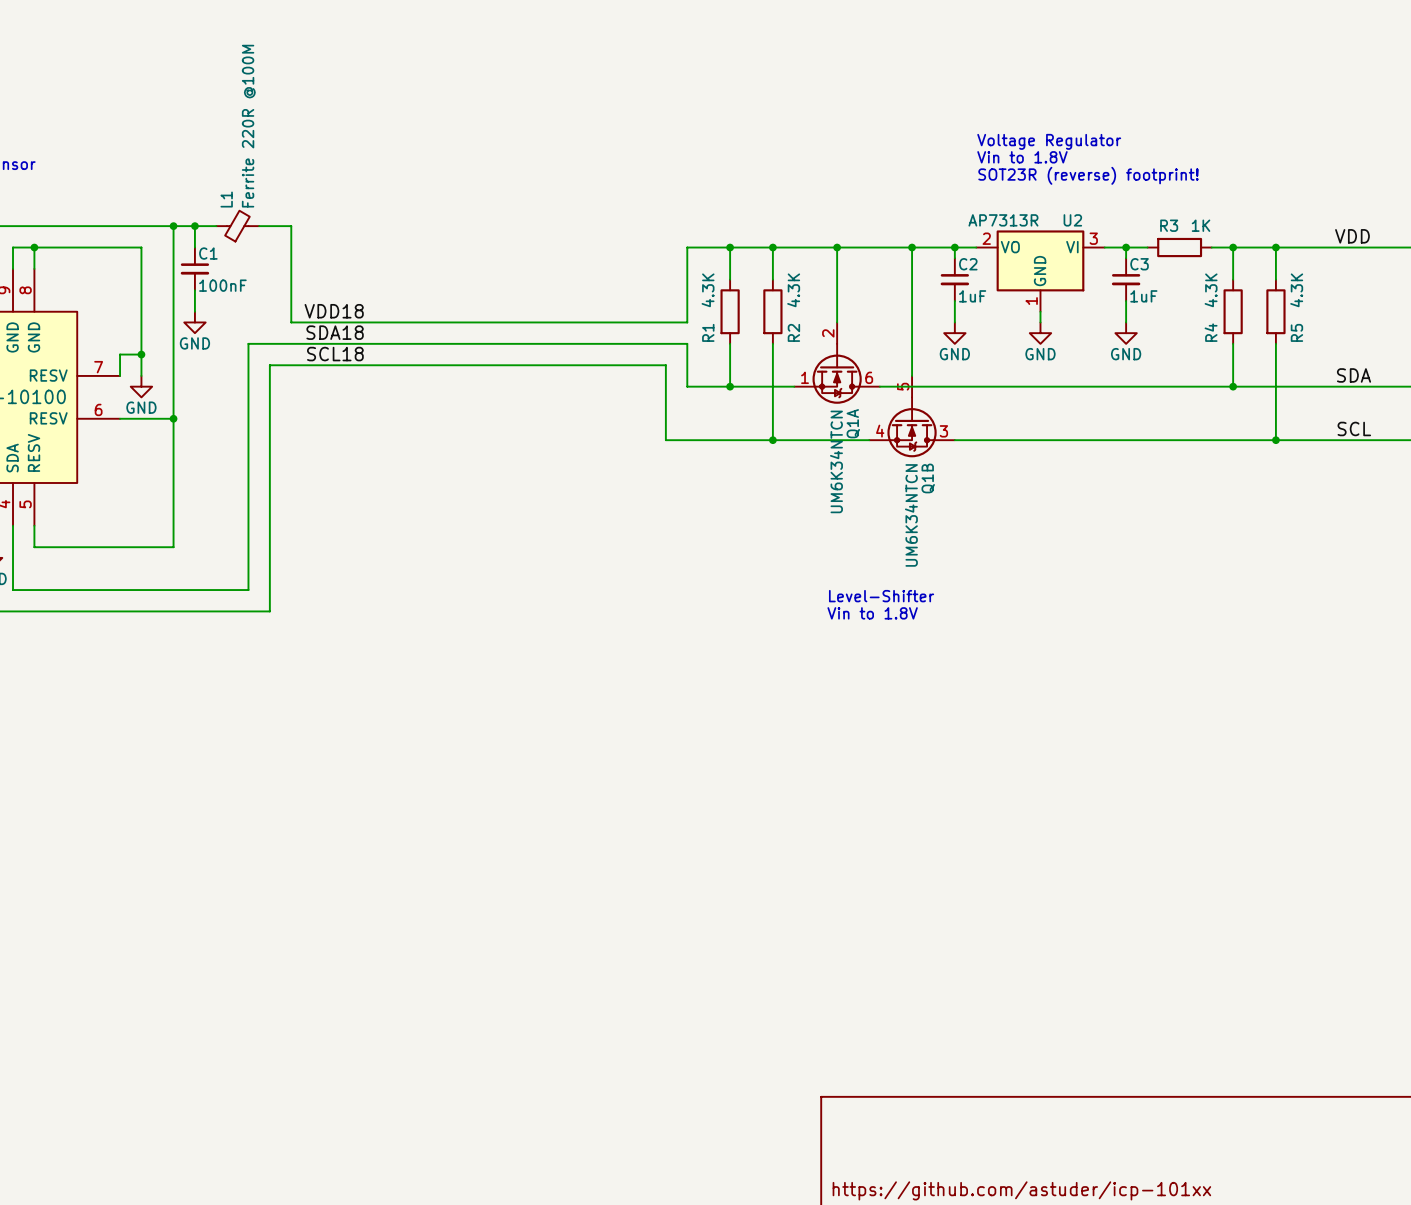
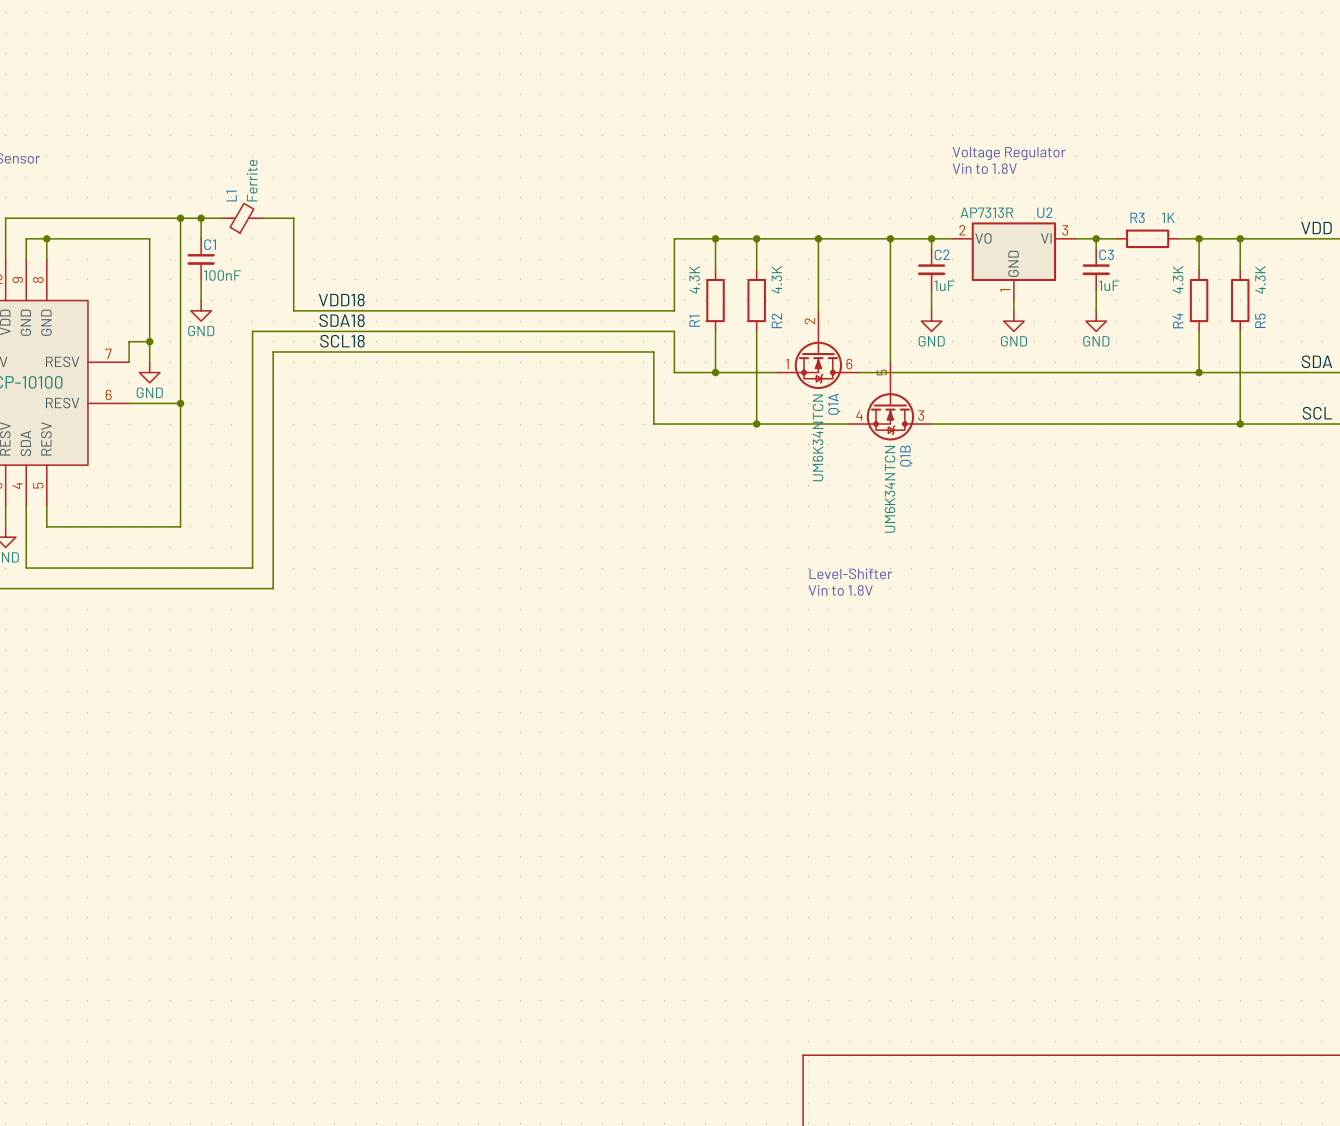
L1 value: Ferrite 220R @100M (248, 126) -> Ferrite (252, 180)
text: Voltage Regulator (1049, 141) -> none
text: Vin to 1.8V (1022, 157) -> Voltage Regulator (1009, 153)
text: SOT23R (reverse) footprint! (1088, 175) -> Vin to 1.8V (984, 168)

